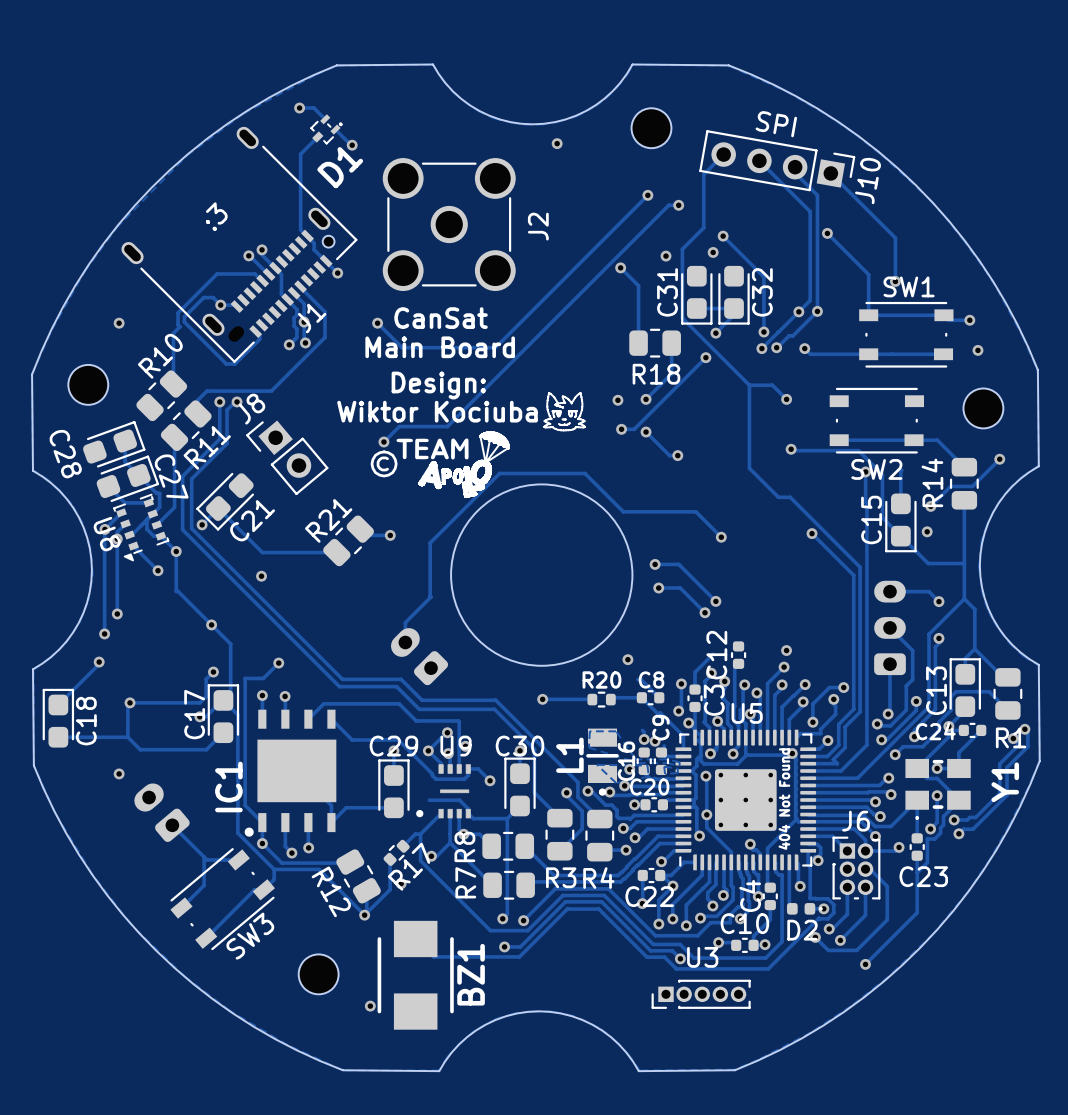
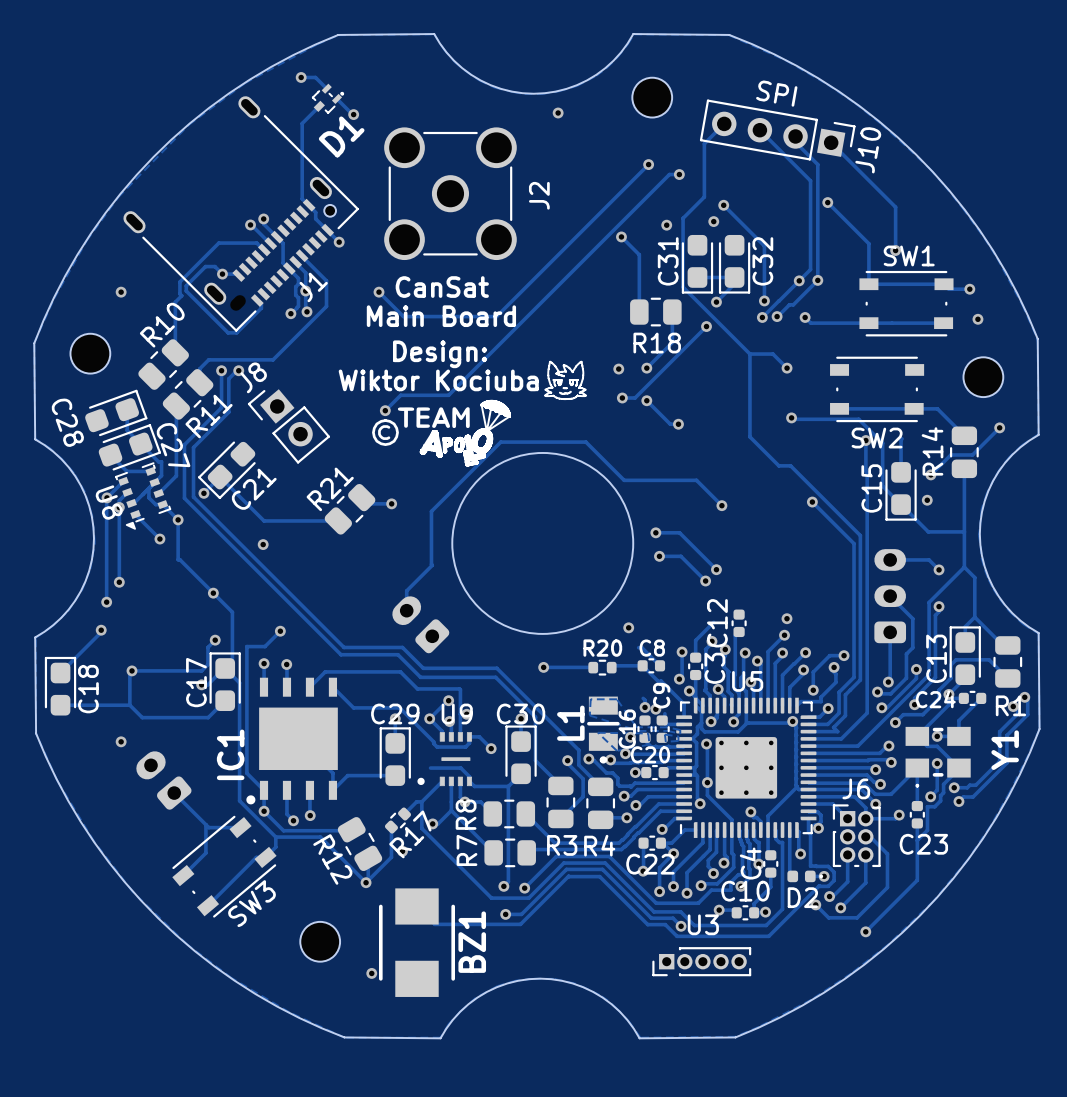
text: :3 (216, 216) -> none
text: 404 Not Found (784, 799) -> none

